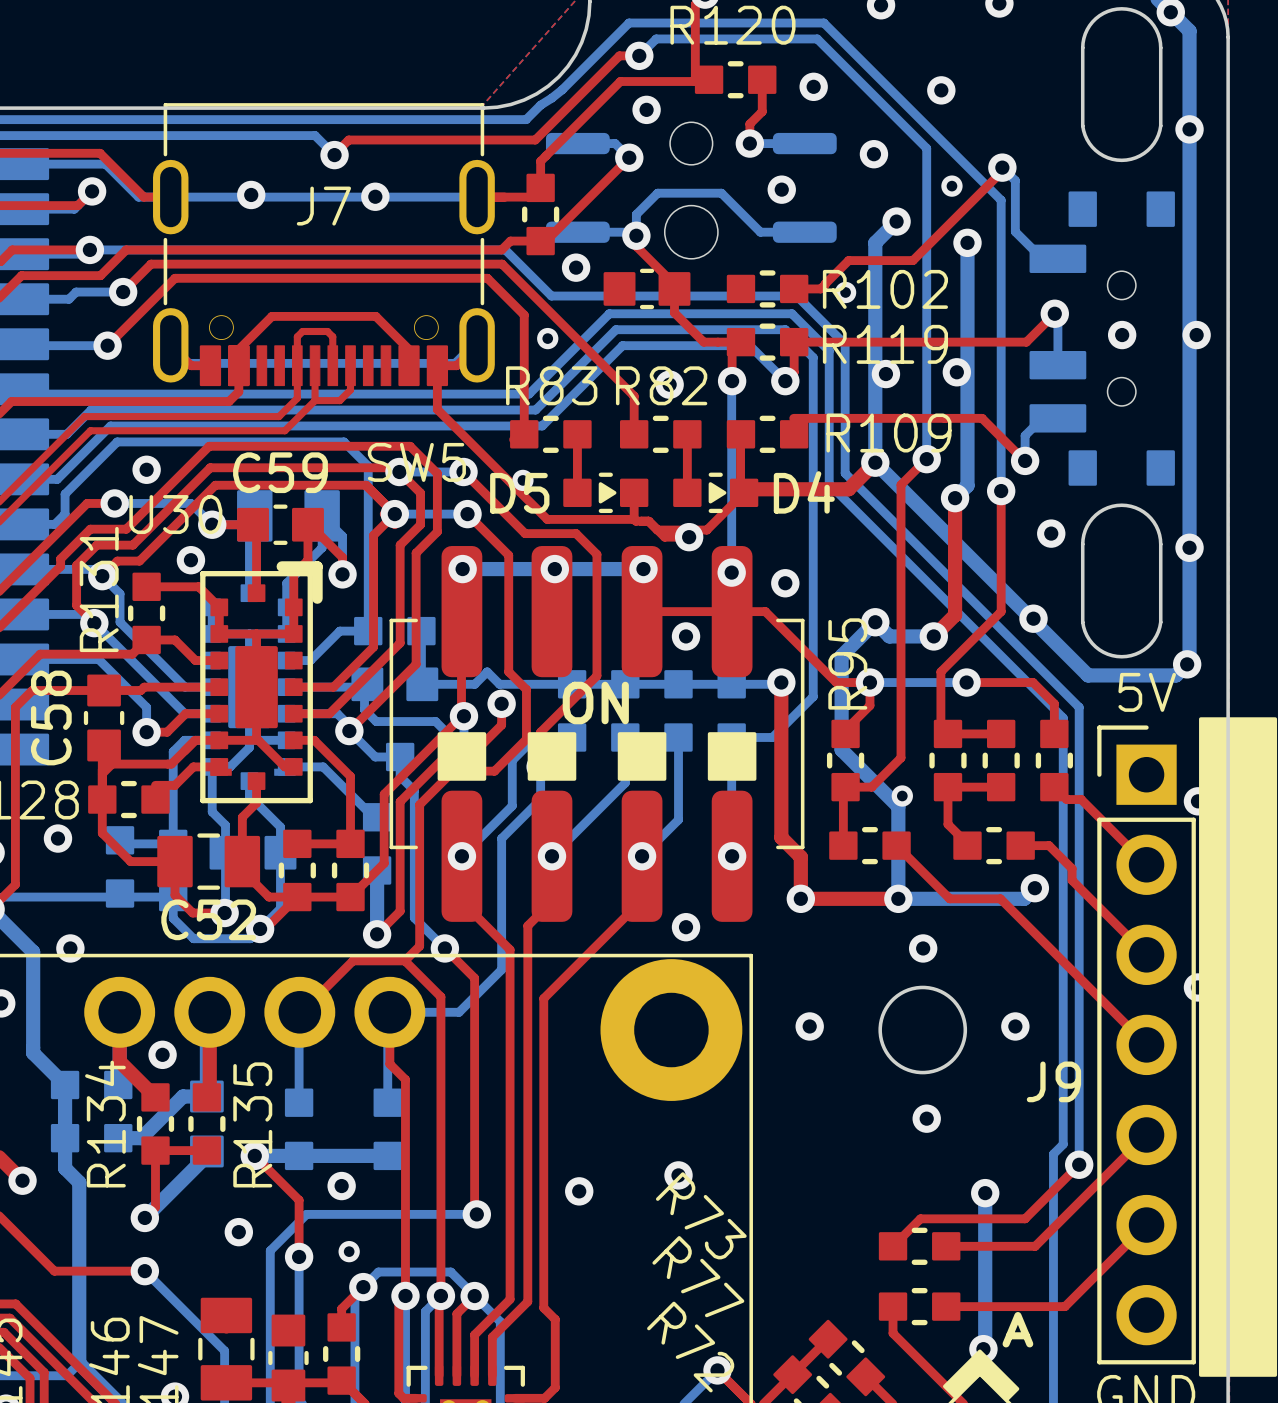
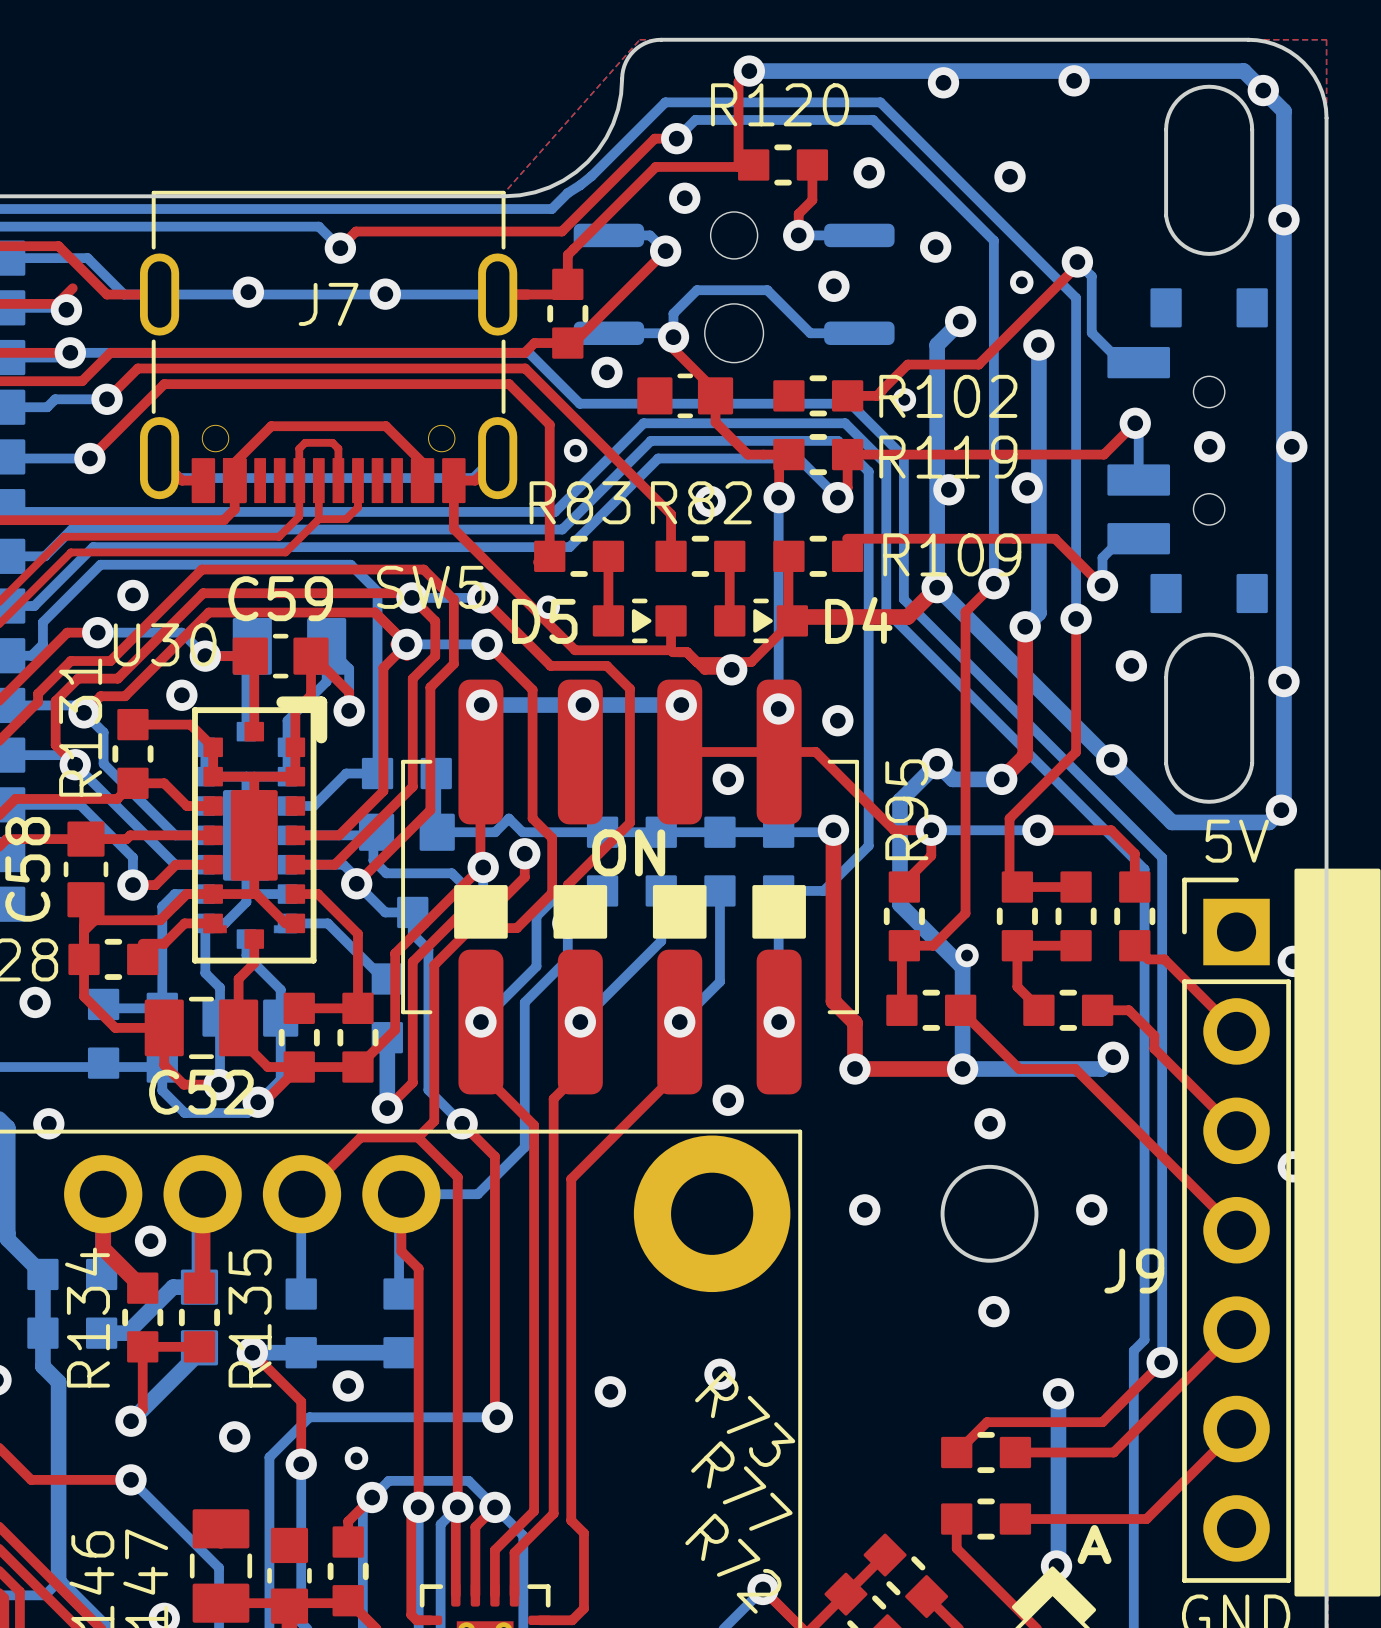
top track: (79, 153) (100, 153) (143, 197) -> (58, 246) (106, 294) (129, 294)
via position: (92, 191) -> (66, 309)

